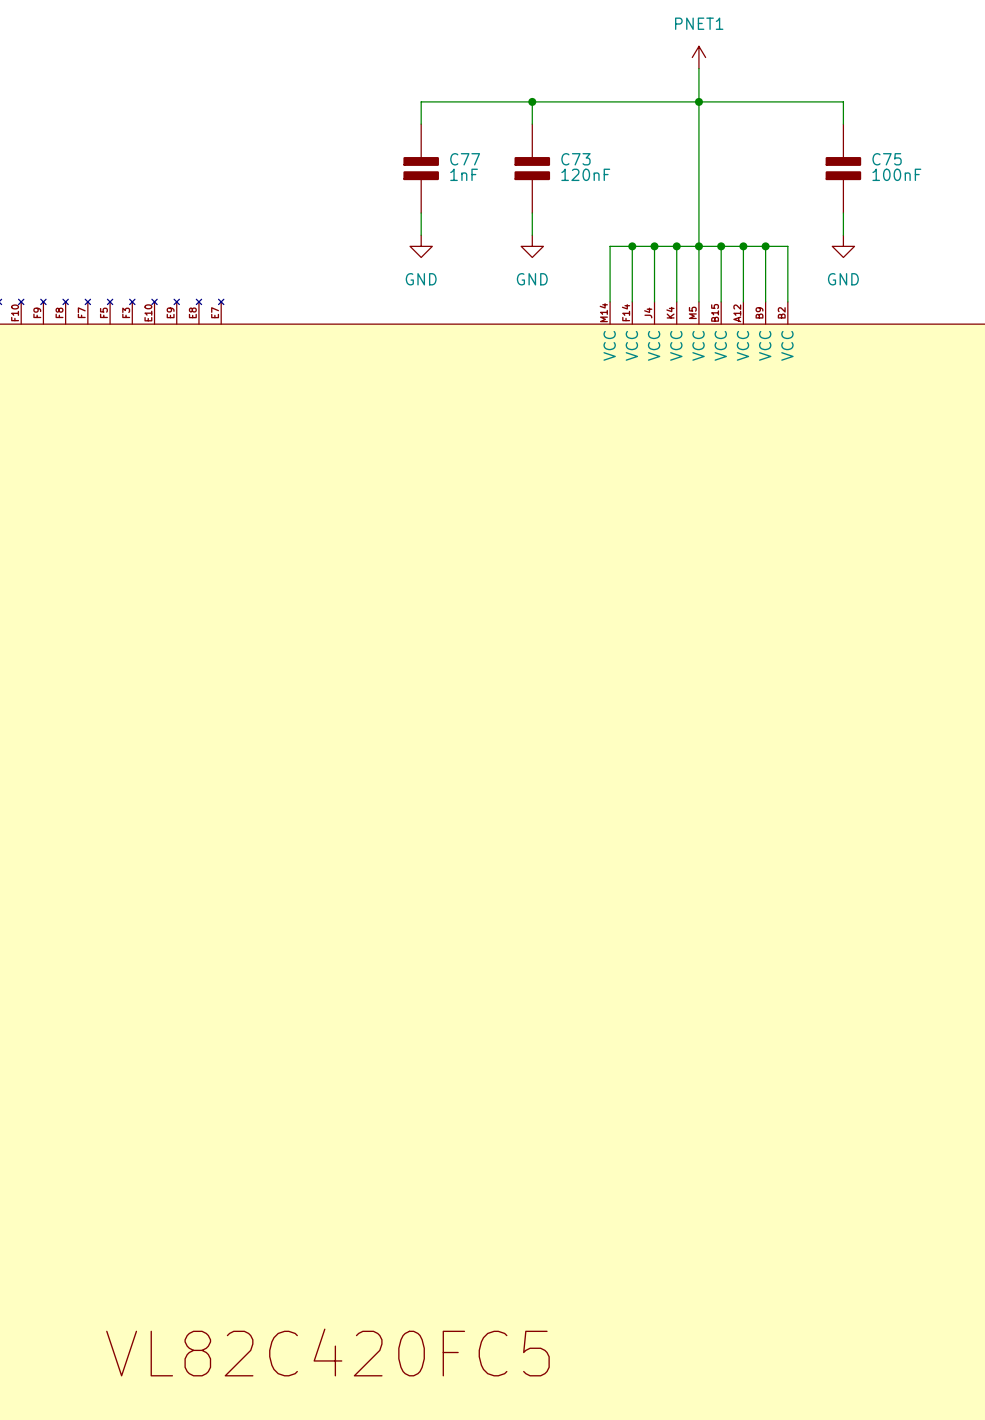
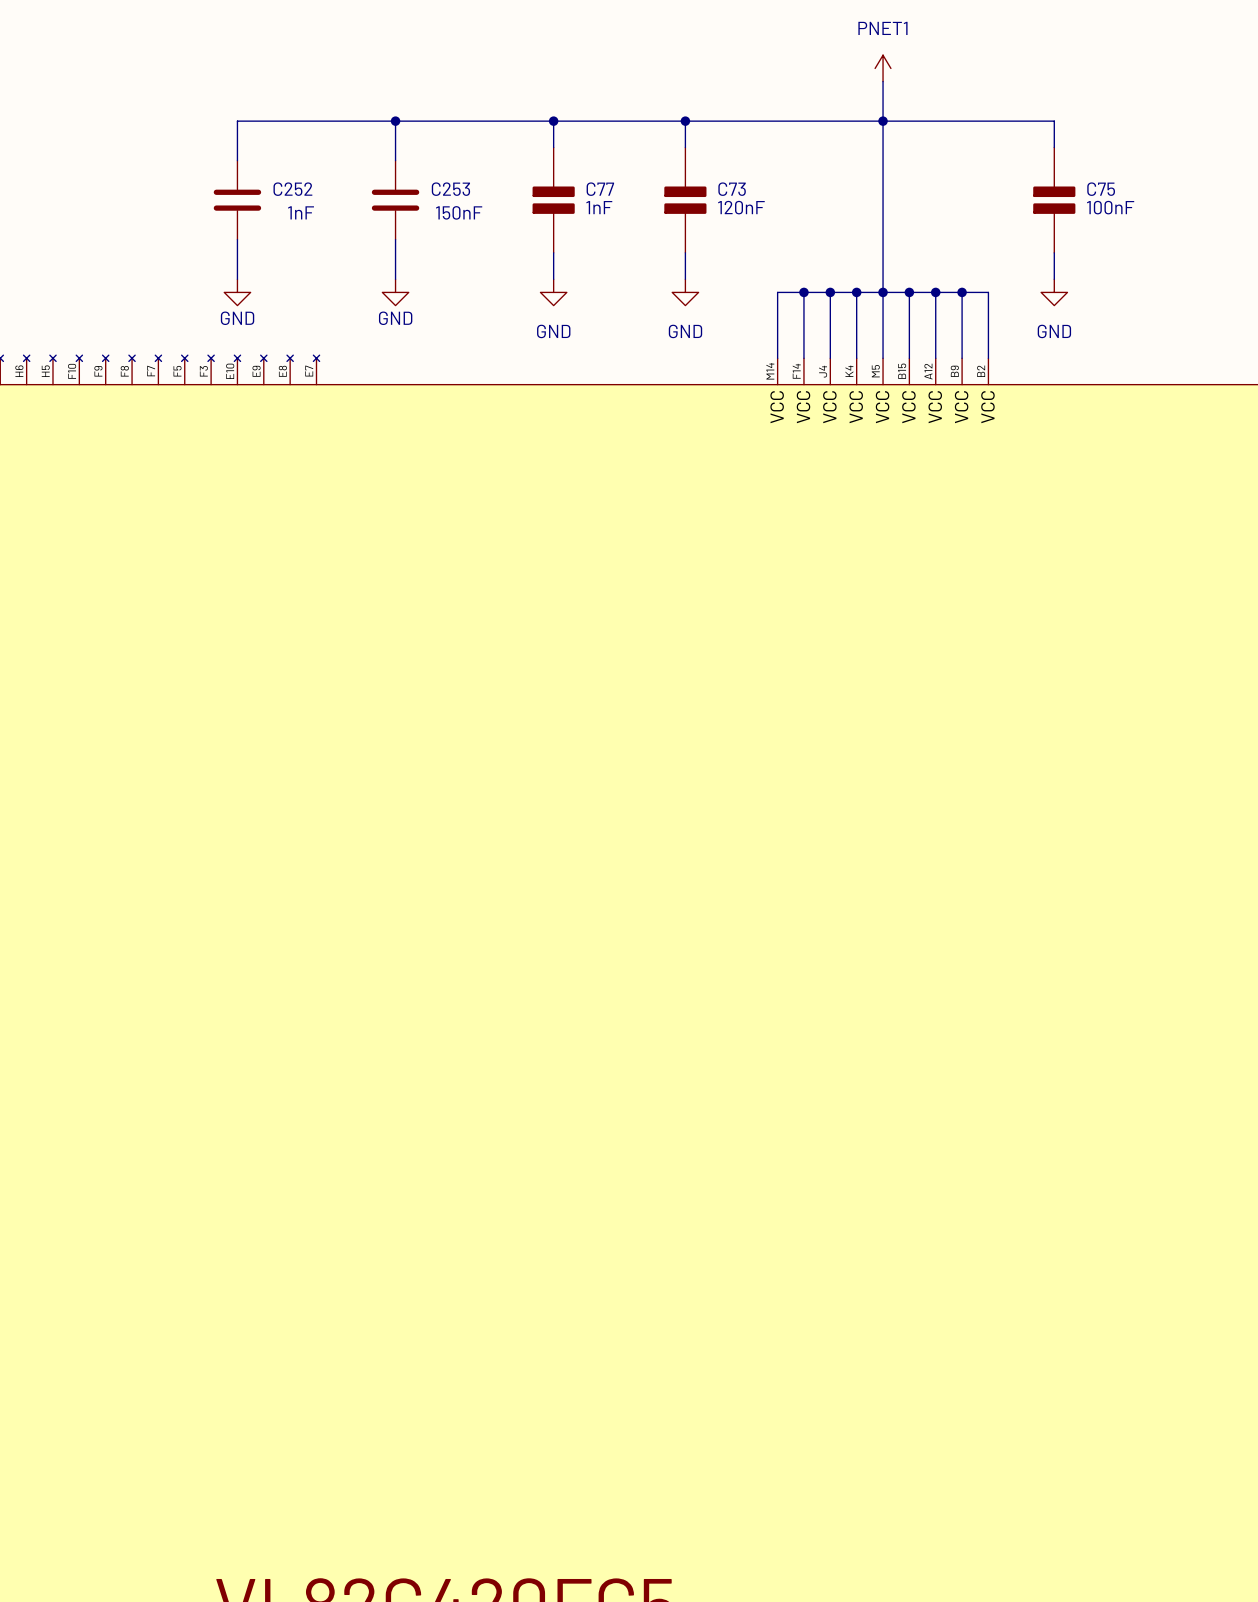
wire: none -> (395, 121) (395, 160)
junction: none -> (395, 121)
wire: none -> (553, 121) (237, 121) (237, 160)
junction: none -> (553, 121)
C252: none -> 1nF (237, 200)
C253: none -> 150nF (395, 200)
wire: none -> (237, 239) (237, 279)
wire: none -> (395, 239) (395, 279)
power symbol: none -> GND (237, 292)
power symbol: none -> GND (395, 292)

